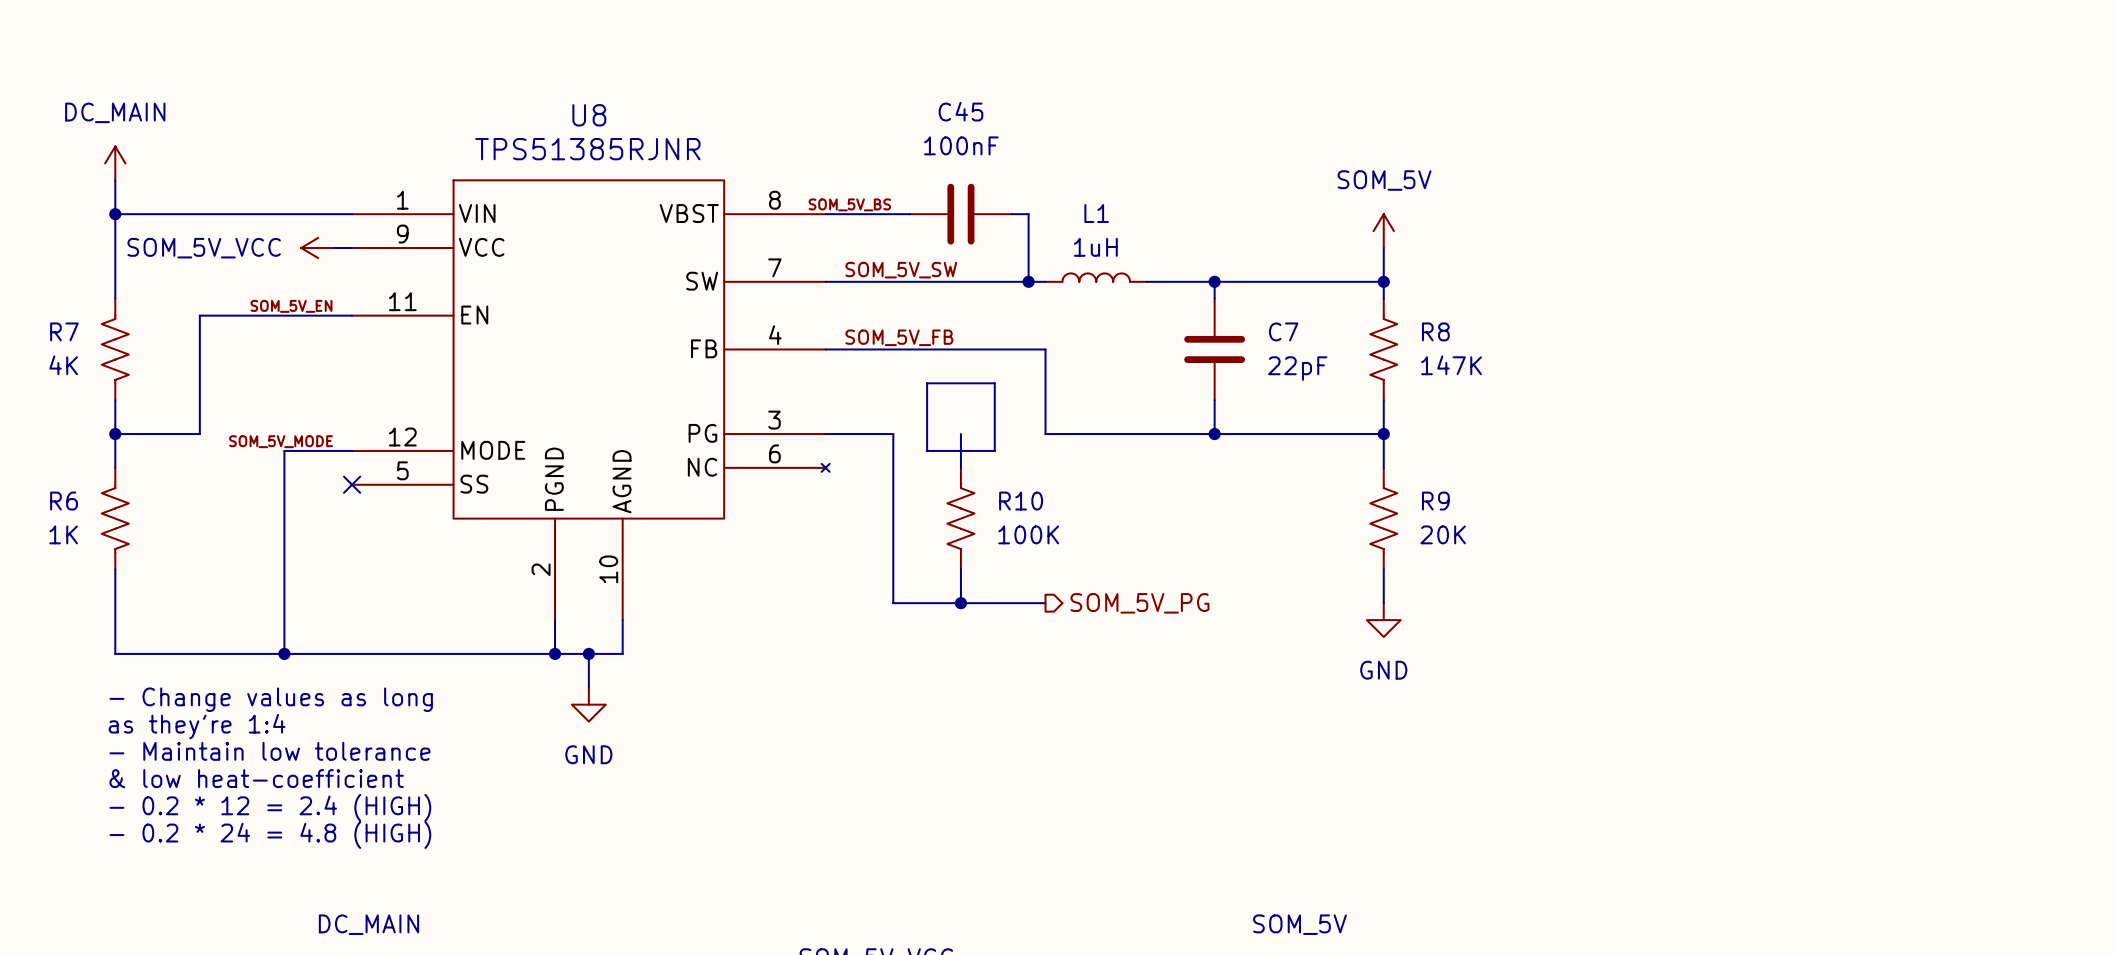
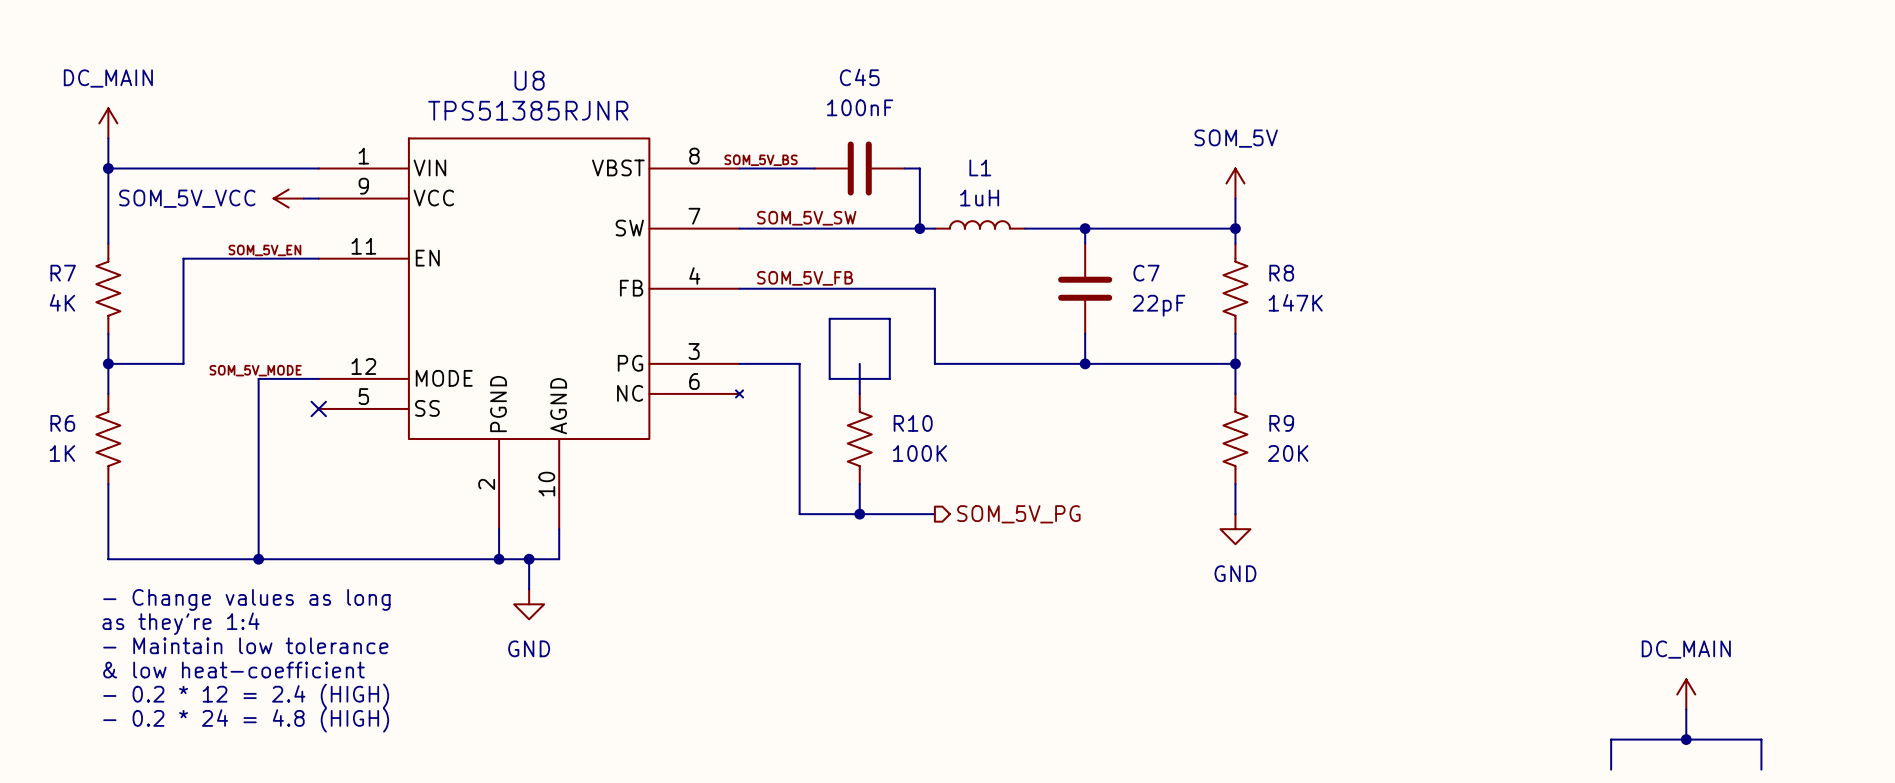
power symbol: none -> DC_MAIN (1686, 694)
wire: none -> (1686, 709) (1686, 739)
junction: none -> (1686, 739)
wire: none -> (1611, 769) (1611, 739) (1761, 739) (1761, 769)

